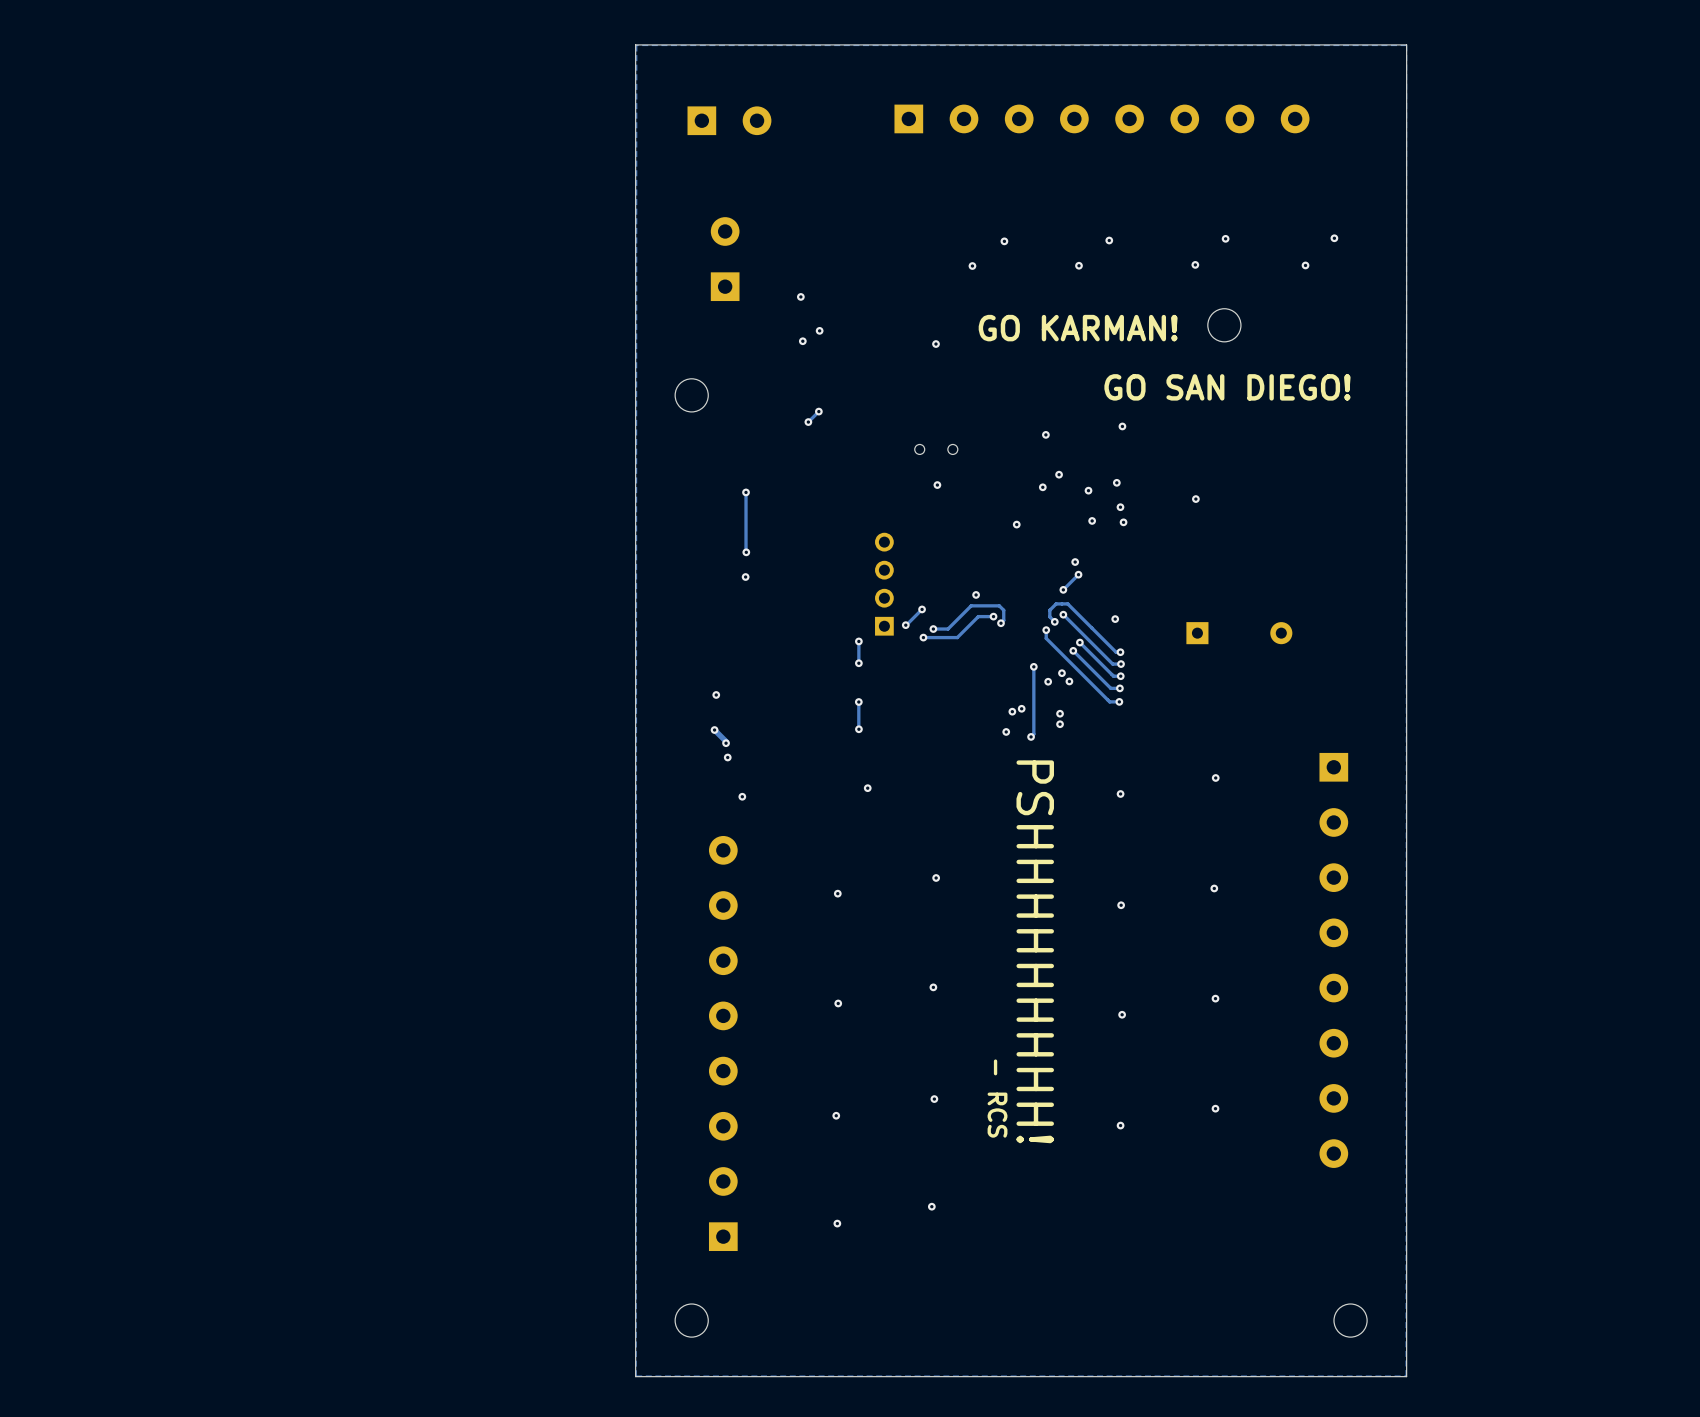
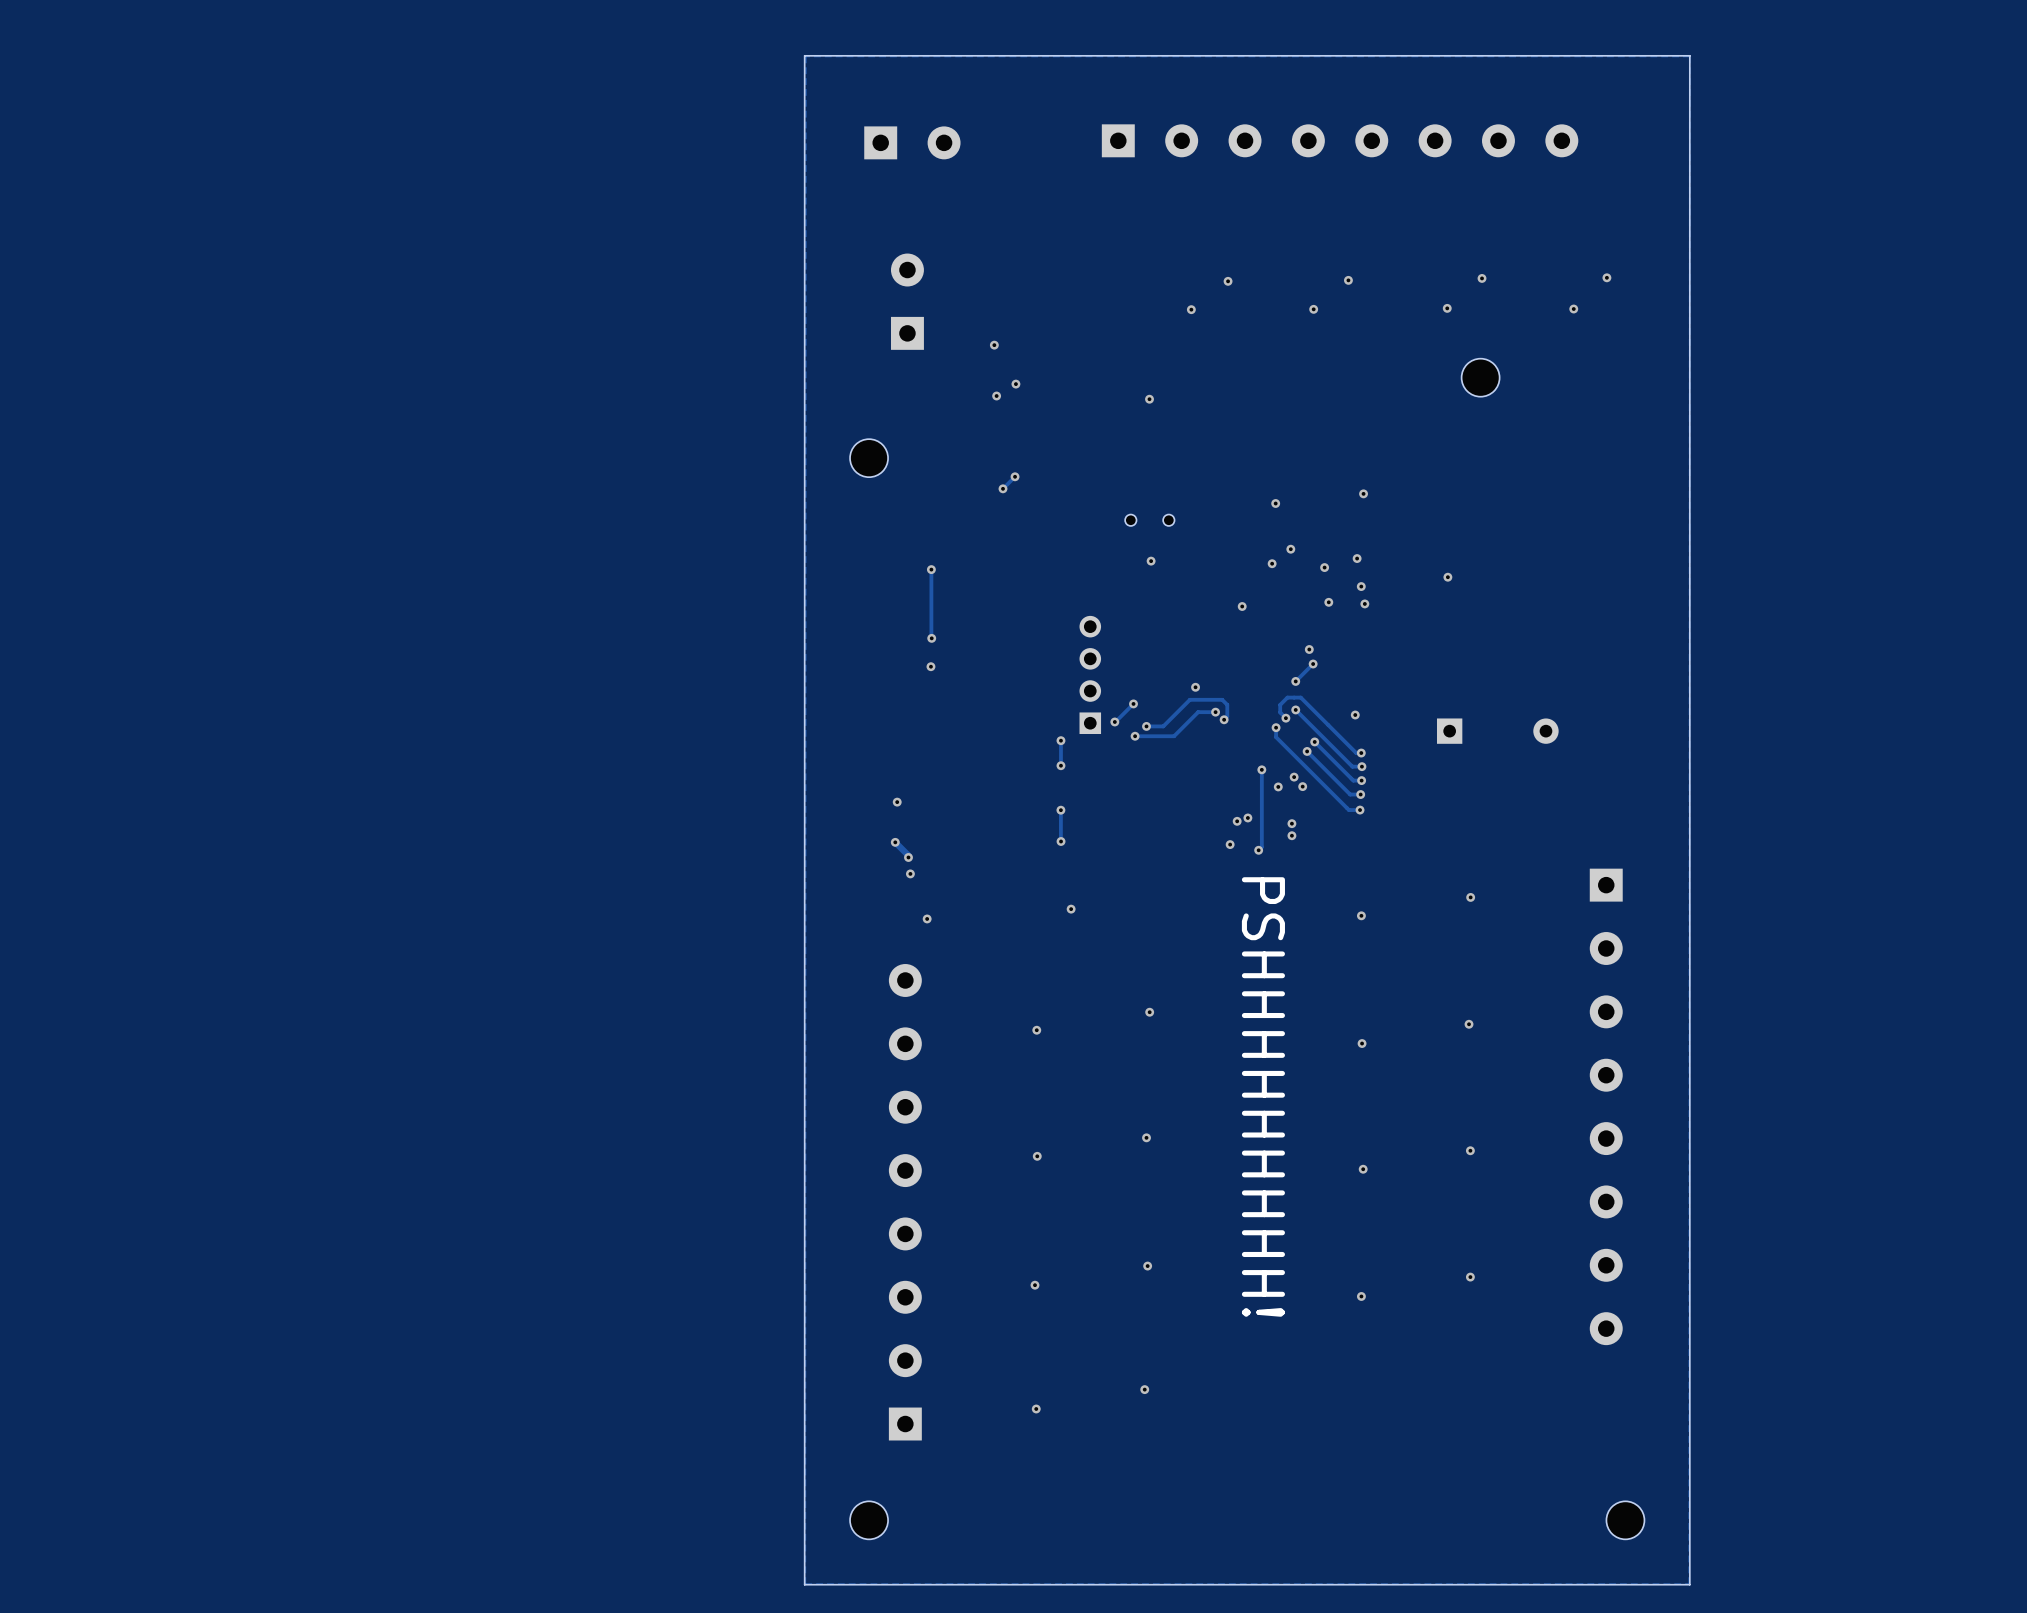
text: GO KARMAN! (1078, 328) -> none
text: GO SAN DIEGO! (1227, 387) -> none
text: - RCS (997, 1098) -> none

